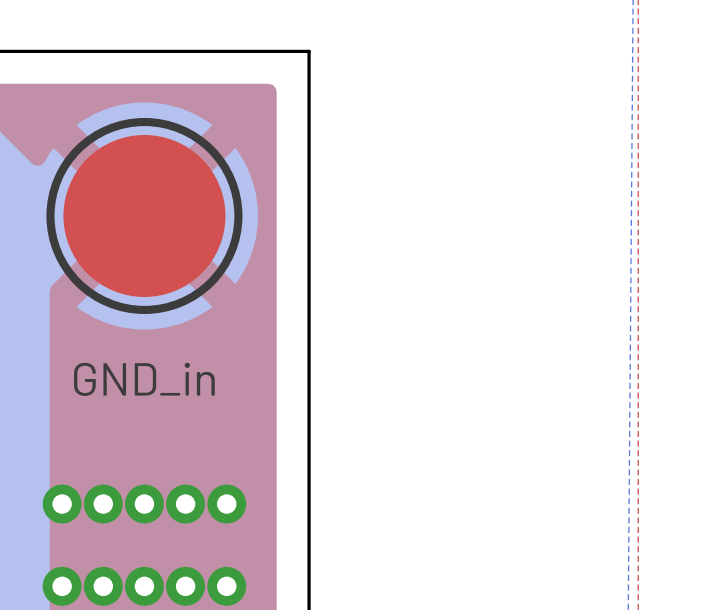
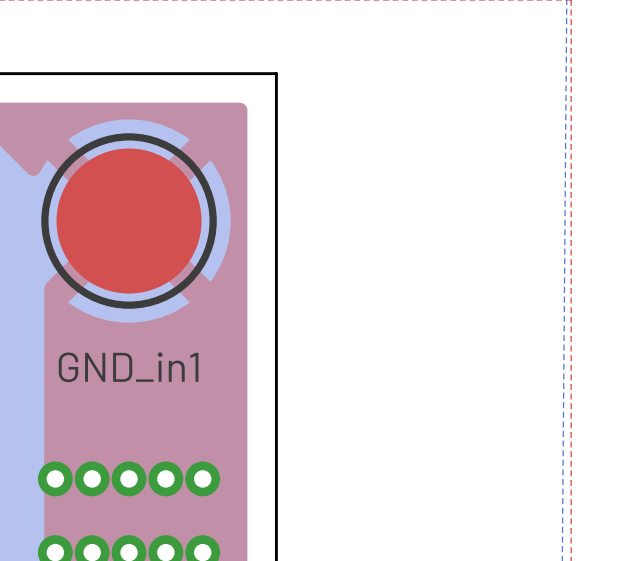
GND_in name: GND_in (144, 379) -> GND_in1 (128, 367)

